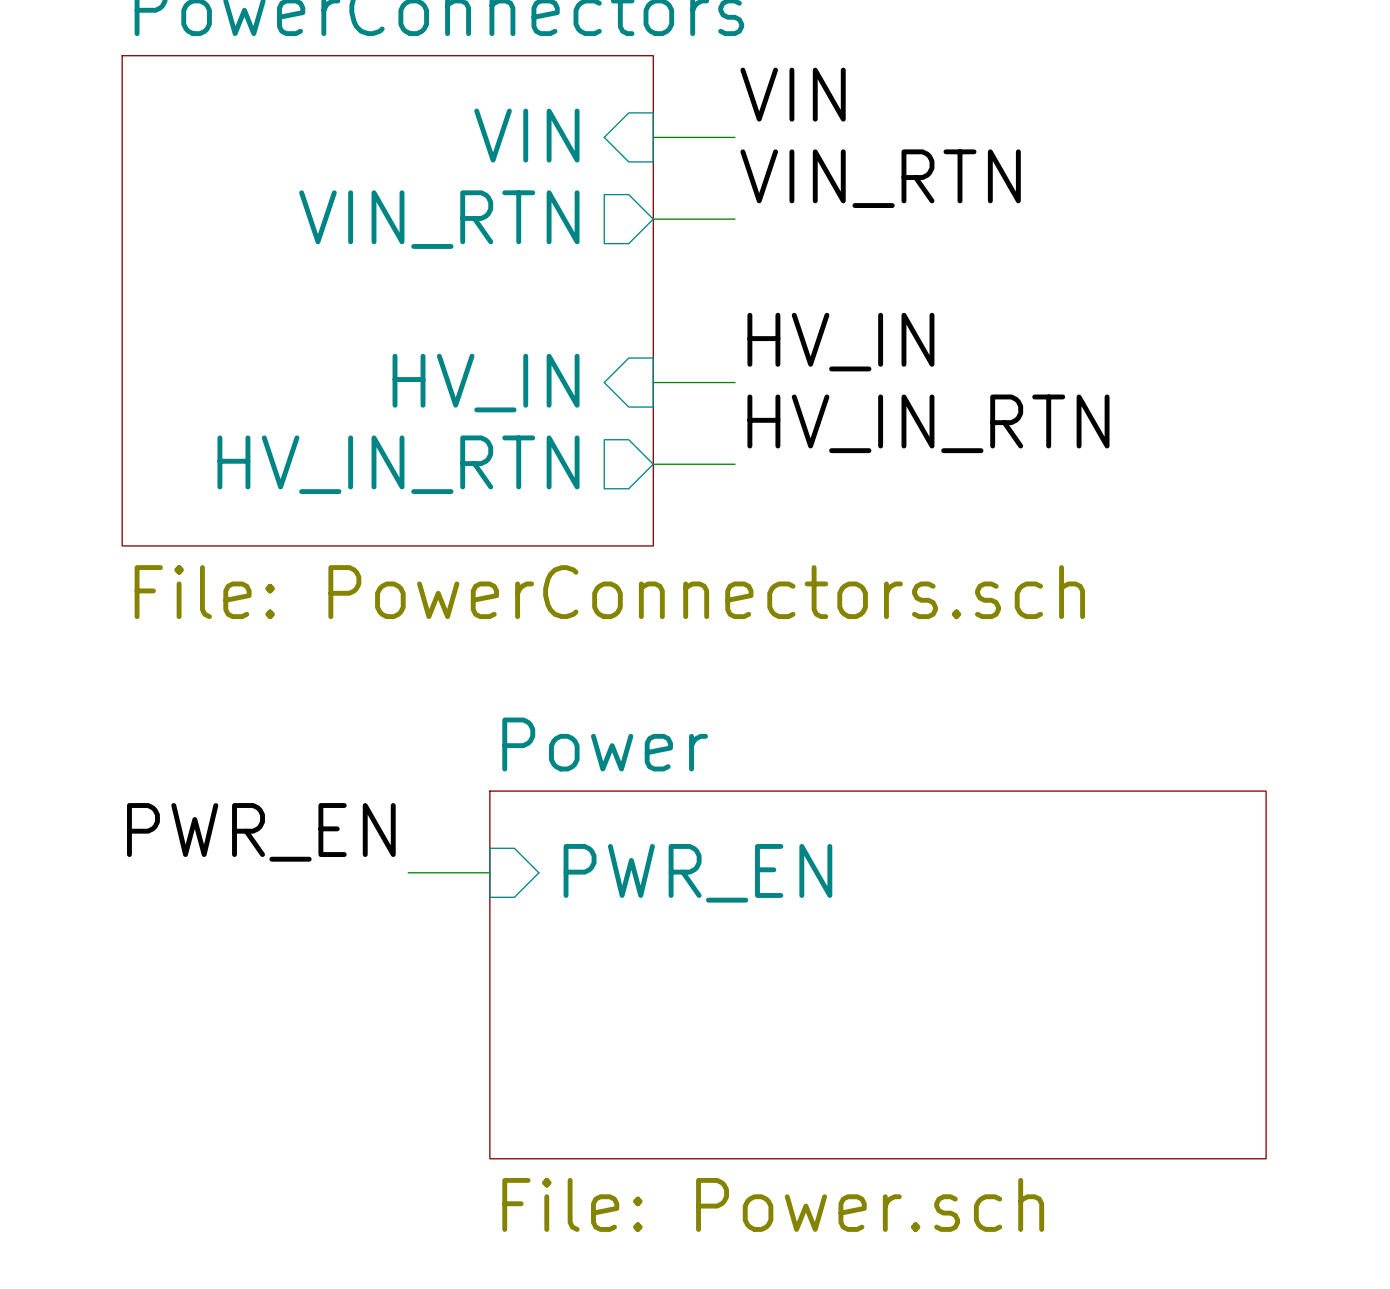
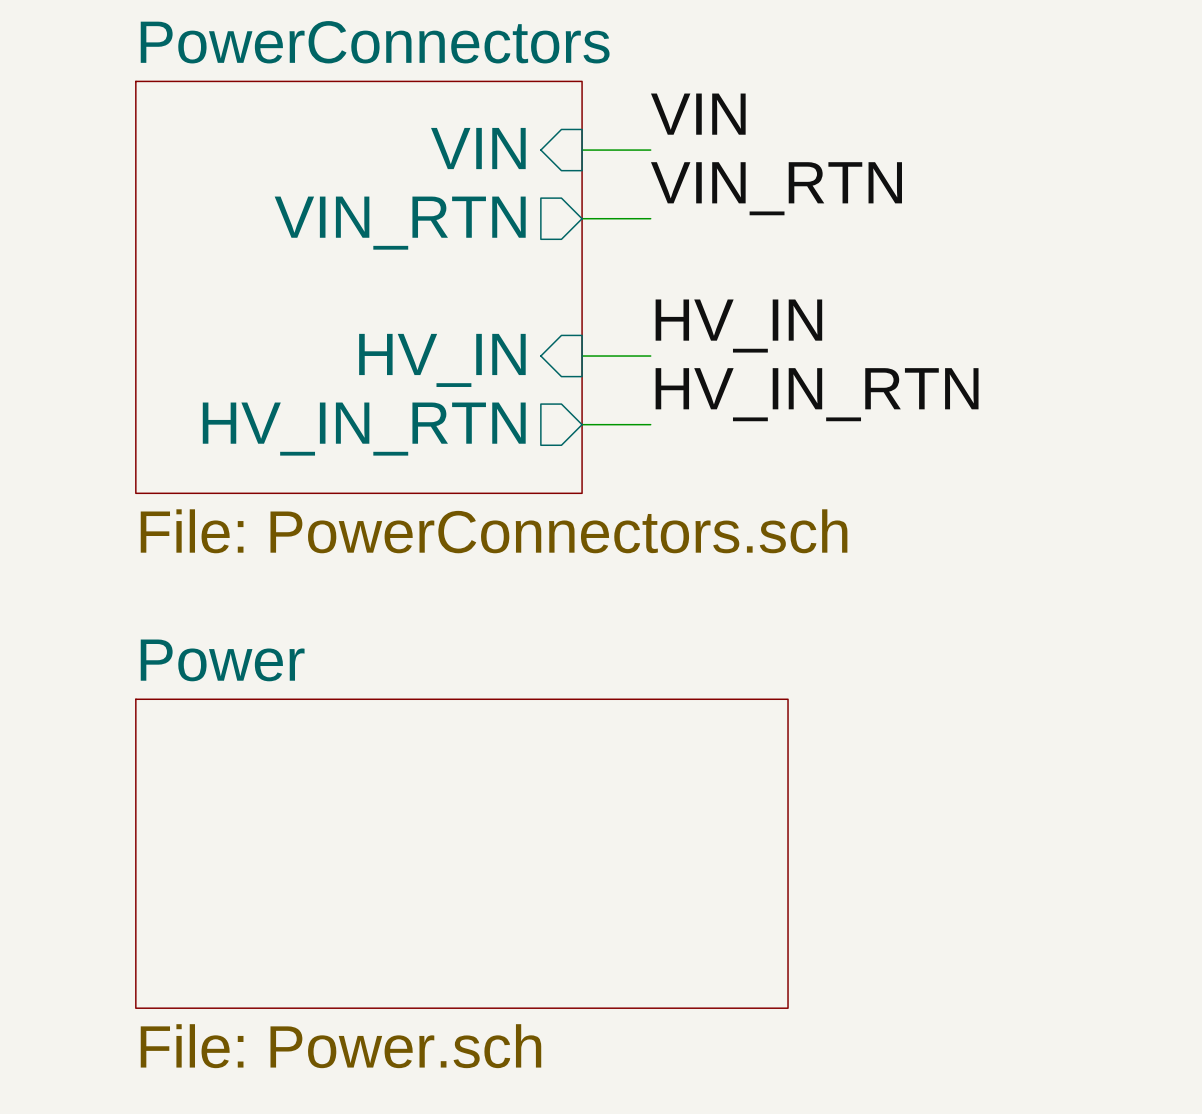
label: PWR_EN (261, 832) -> none
wire: (408, 872) (489, 872) -> none
sheet pin: PWR_EN (697, 873) -> none
sheet Power position: (877, 974) -> (461, 853)

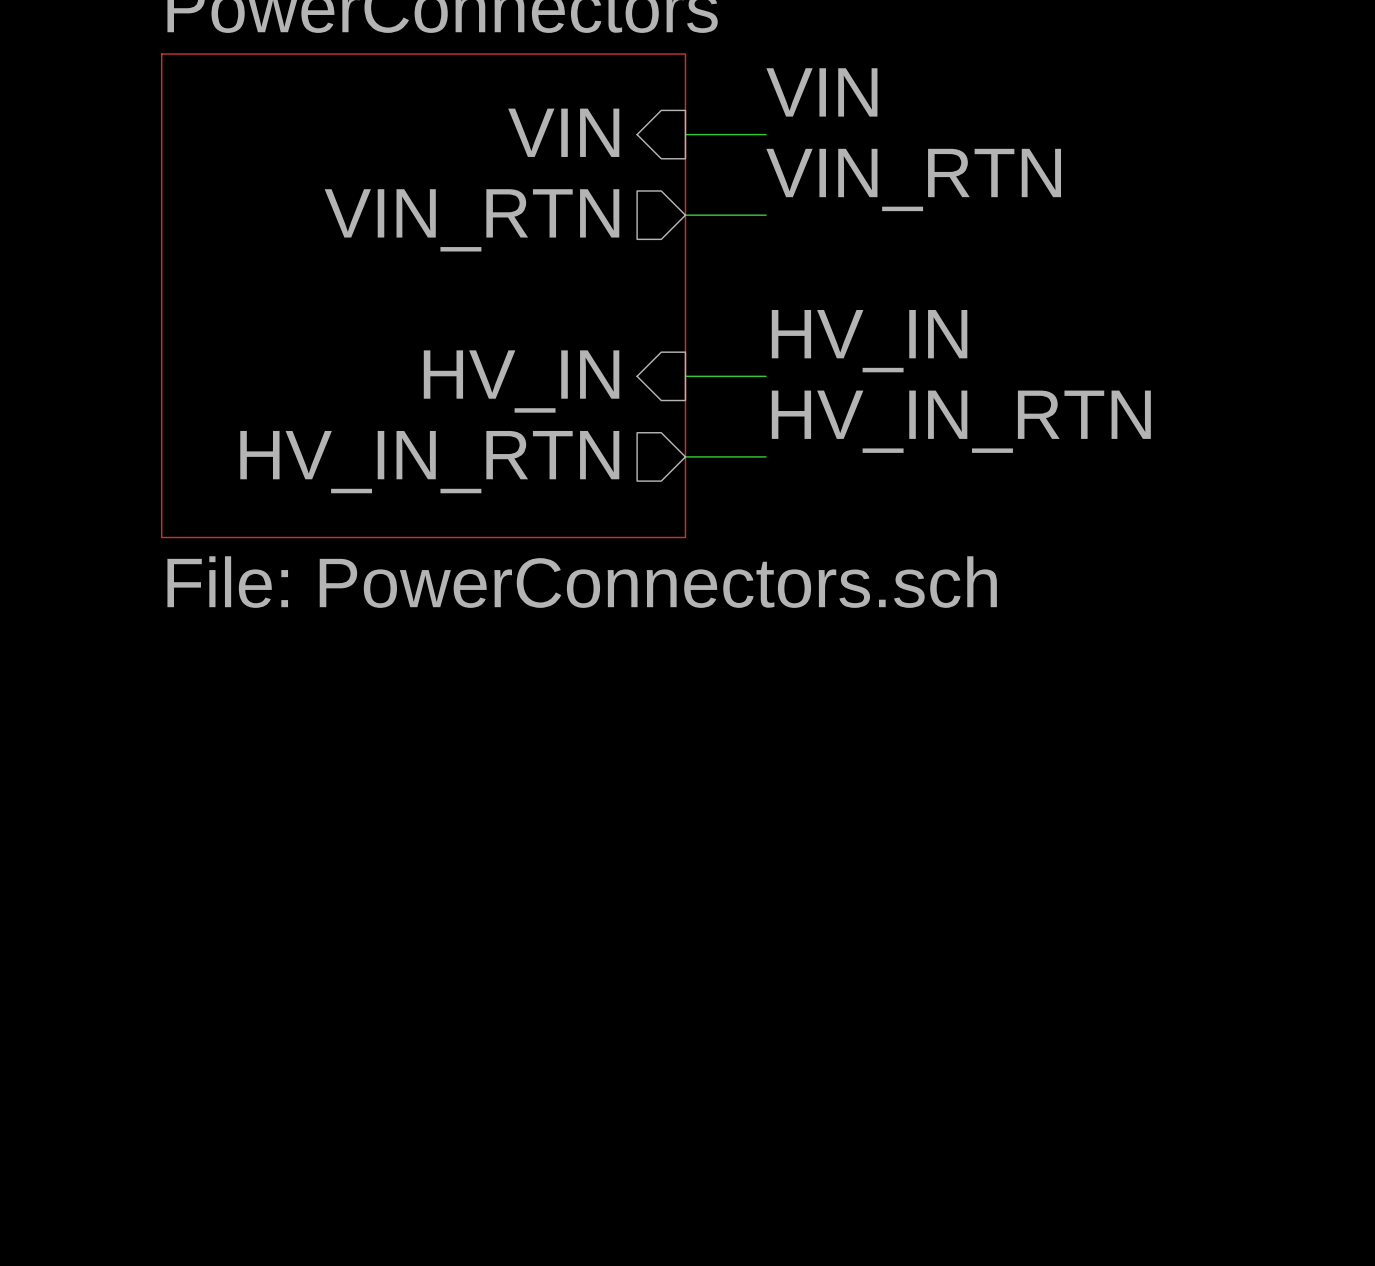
sheet Power: File: Power.sch (461, 853) -> none

